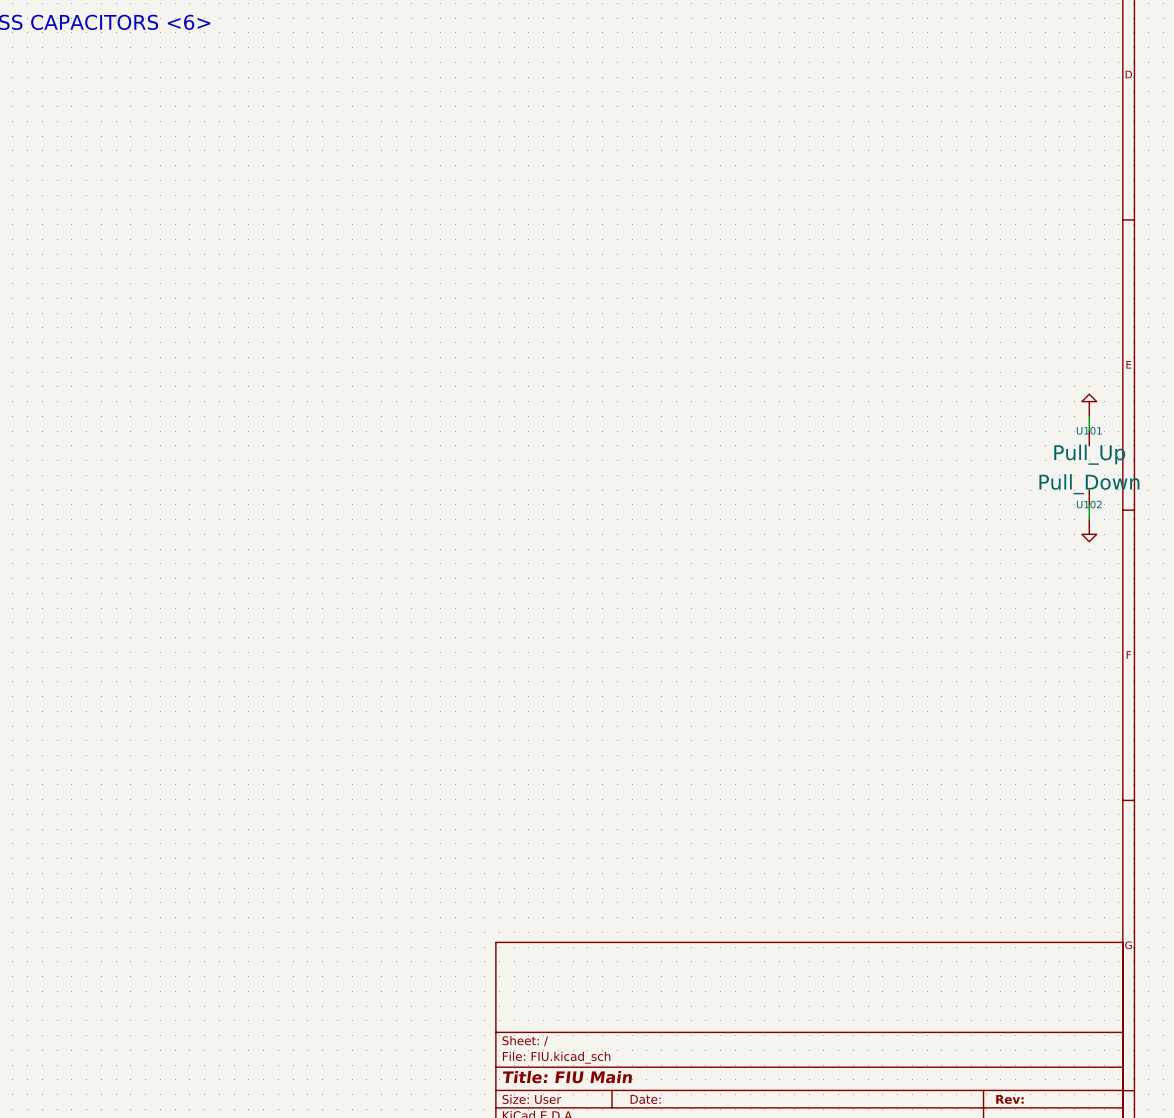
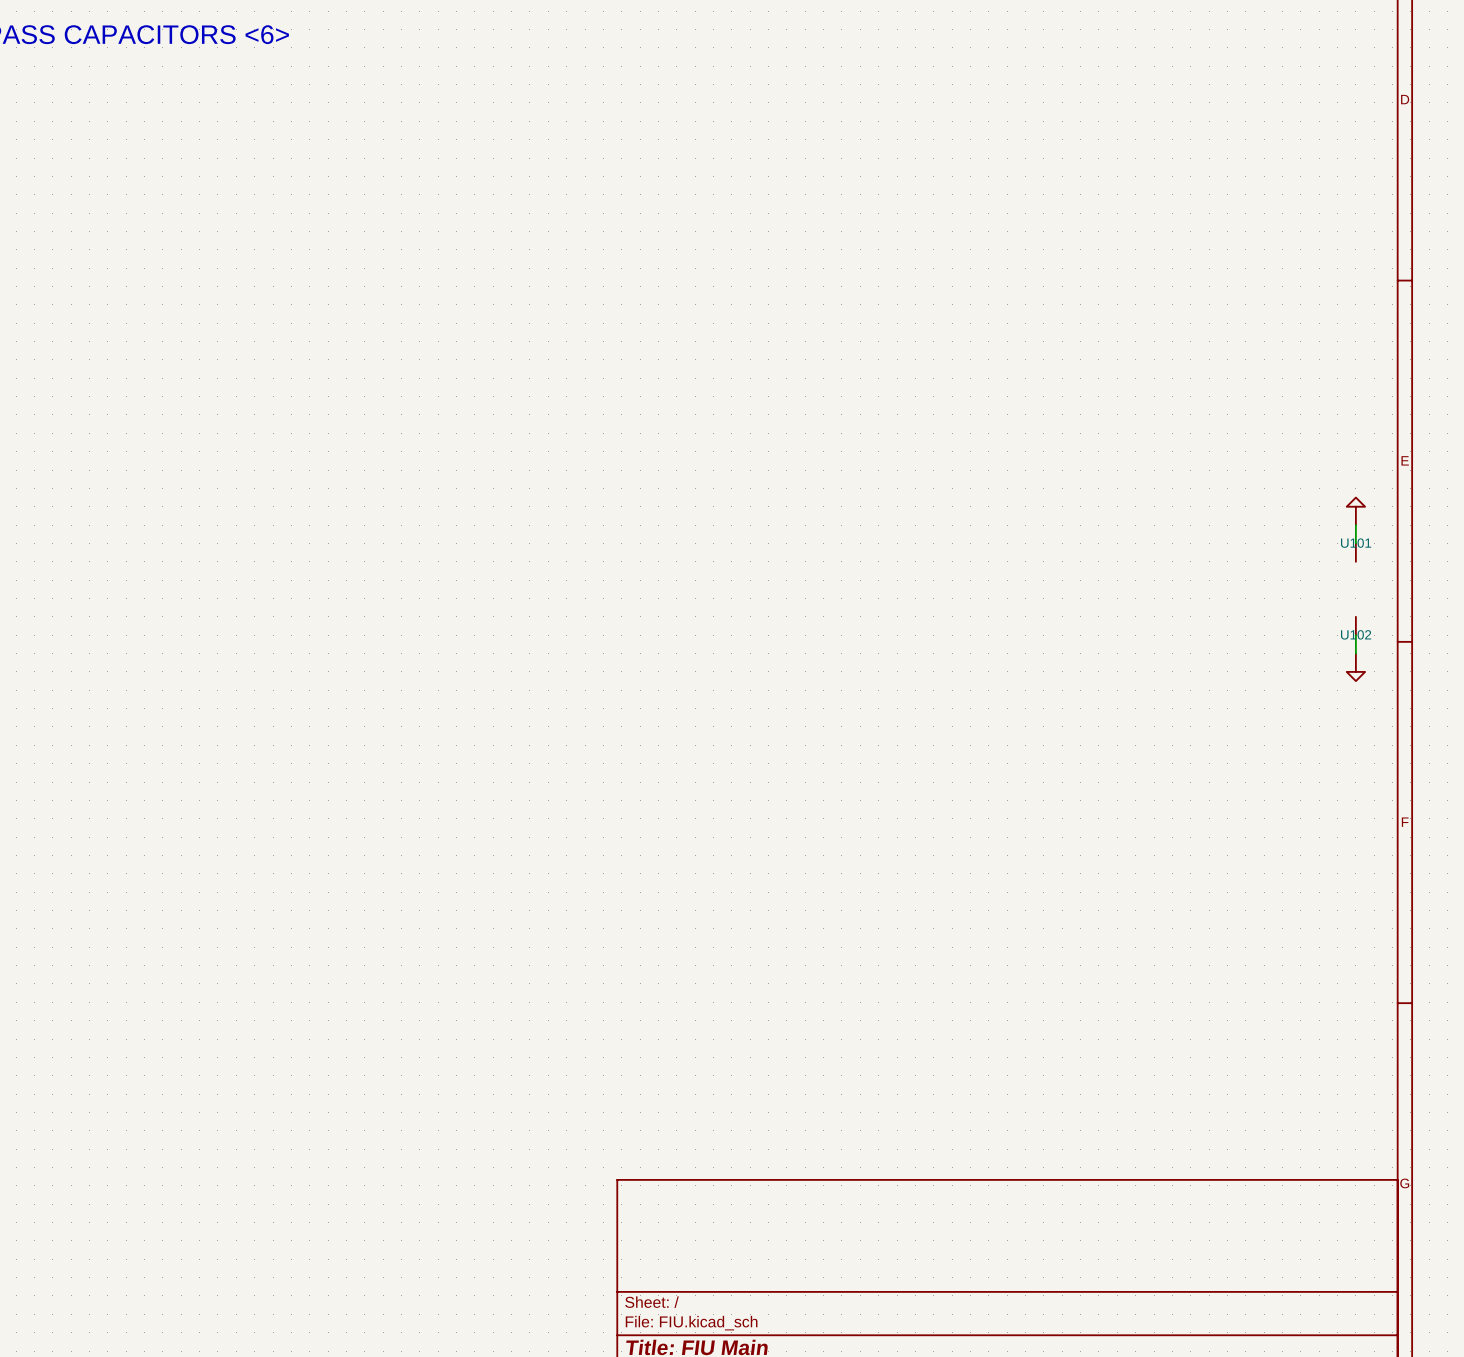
U101 value: Pull_Up (1089, 454) -> none
U102 value: Pull_Down (1089, 484) -> none

